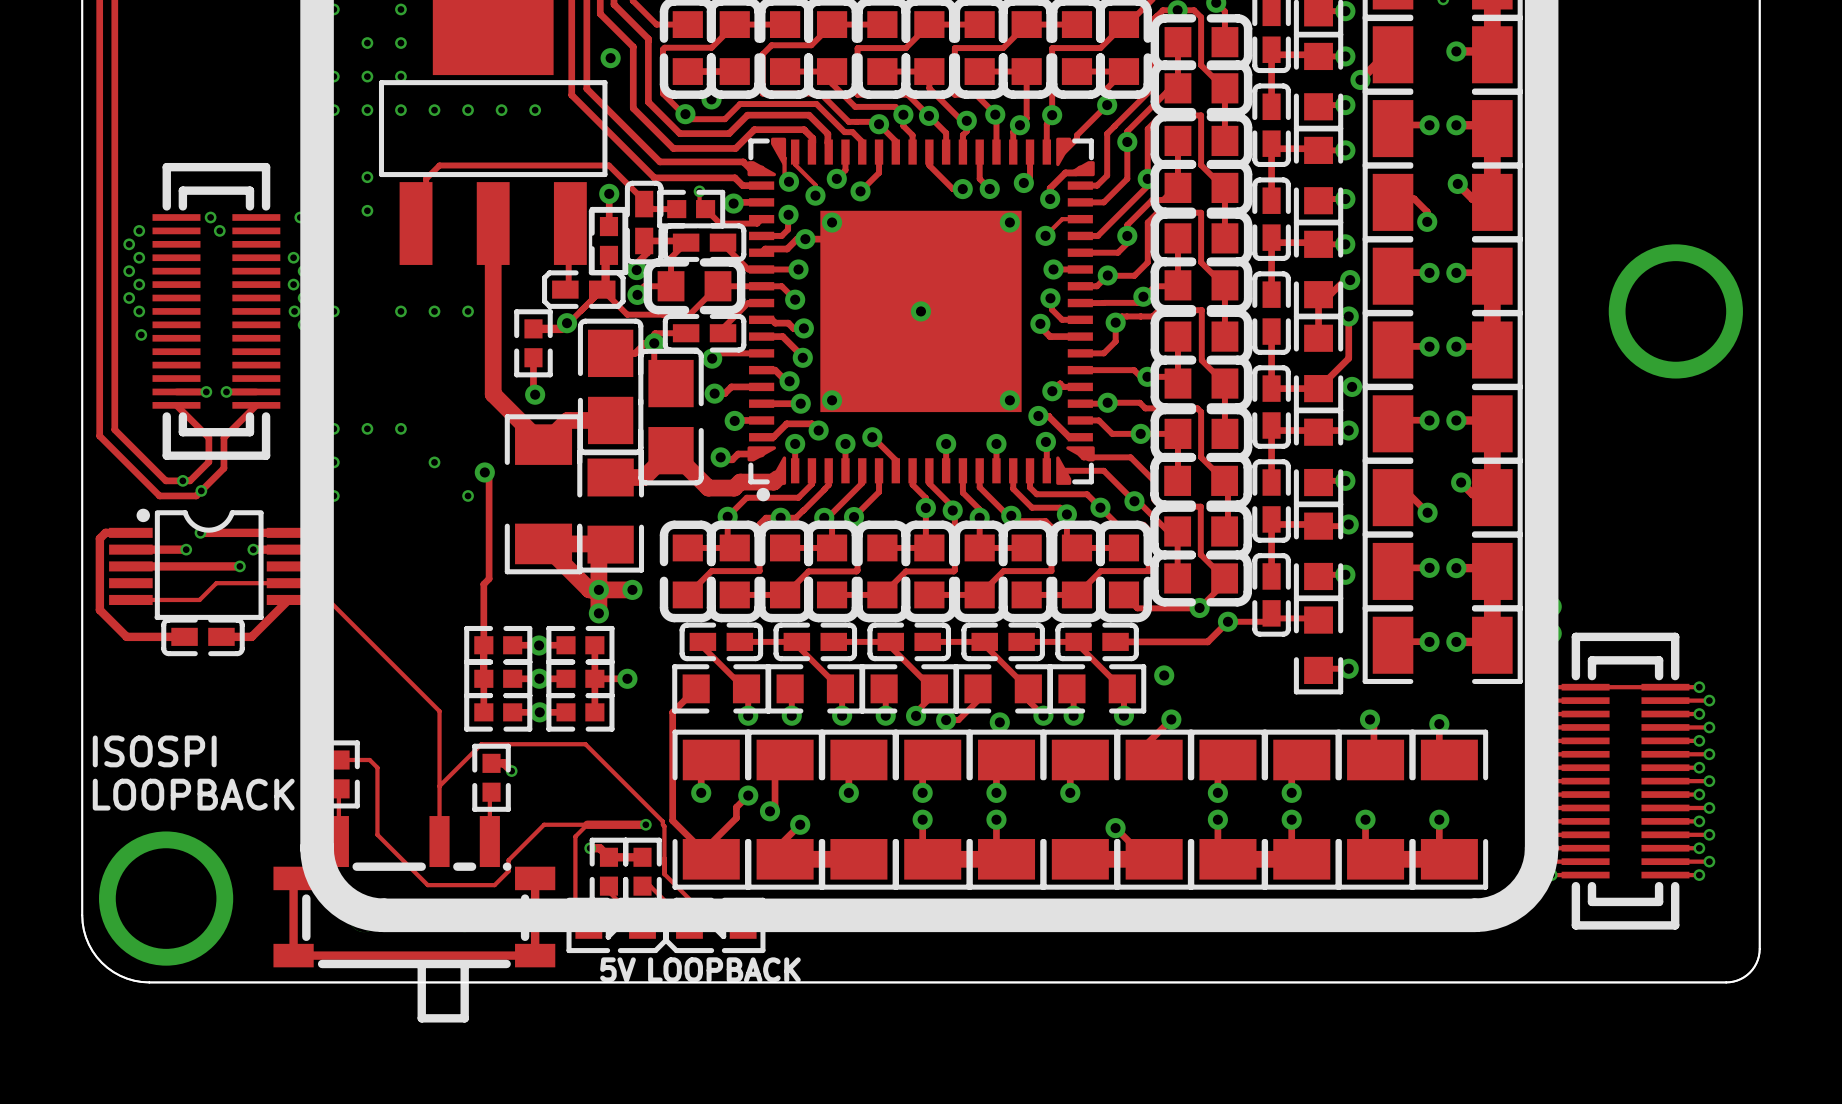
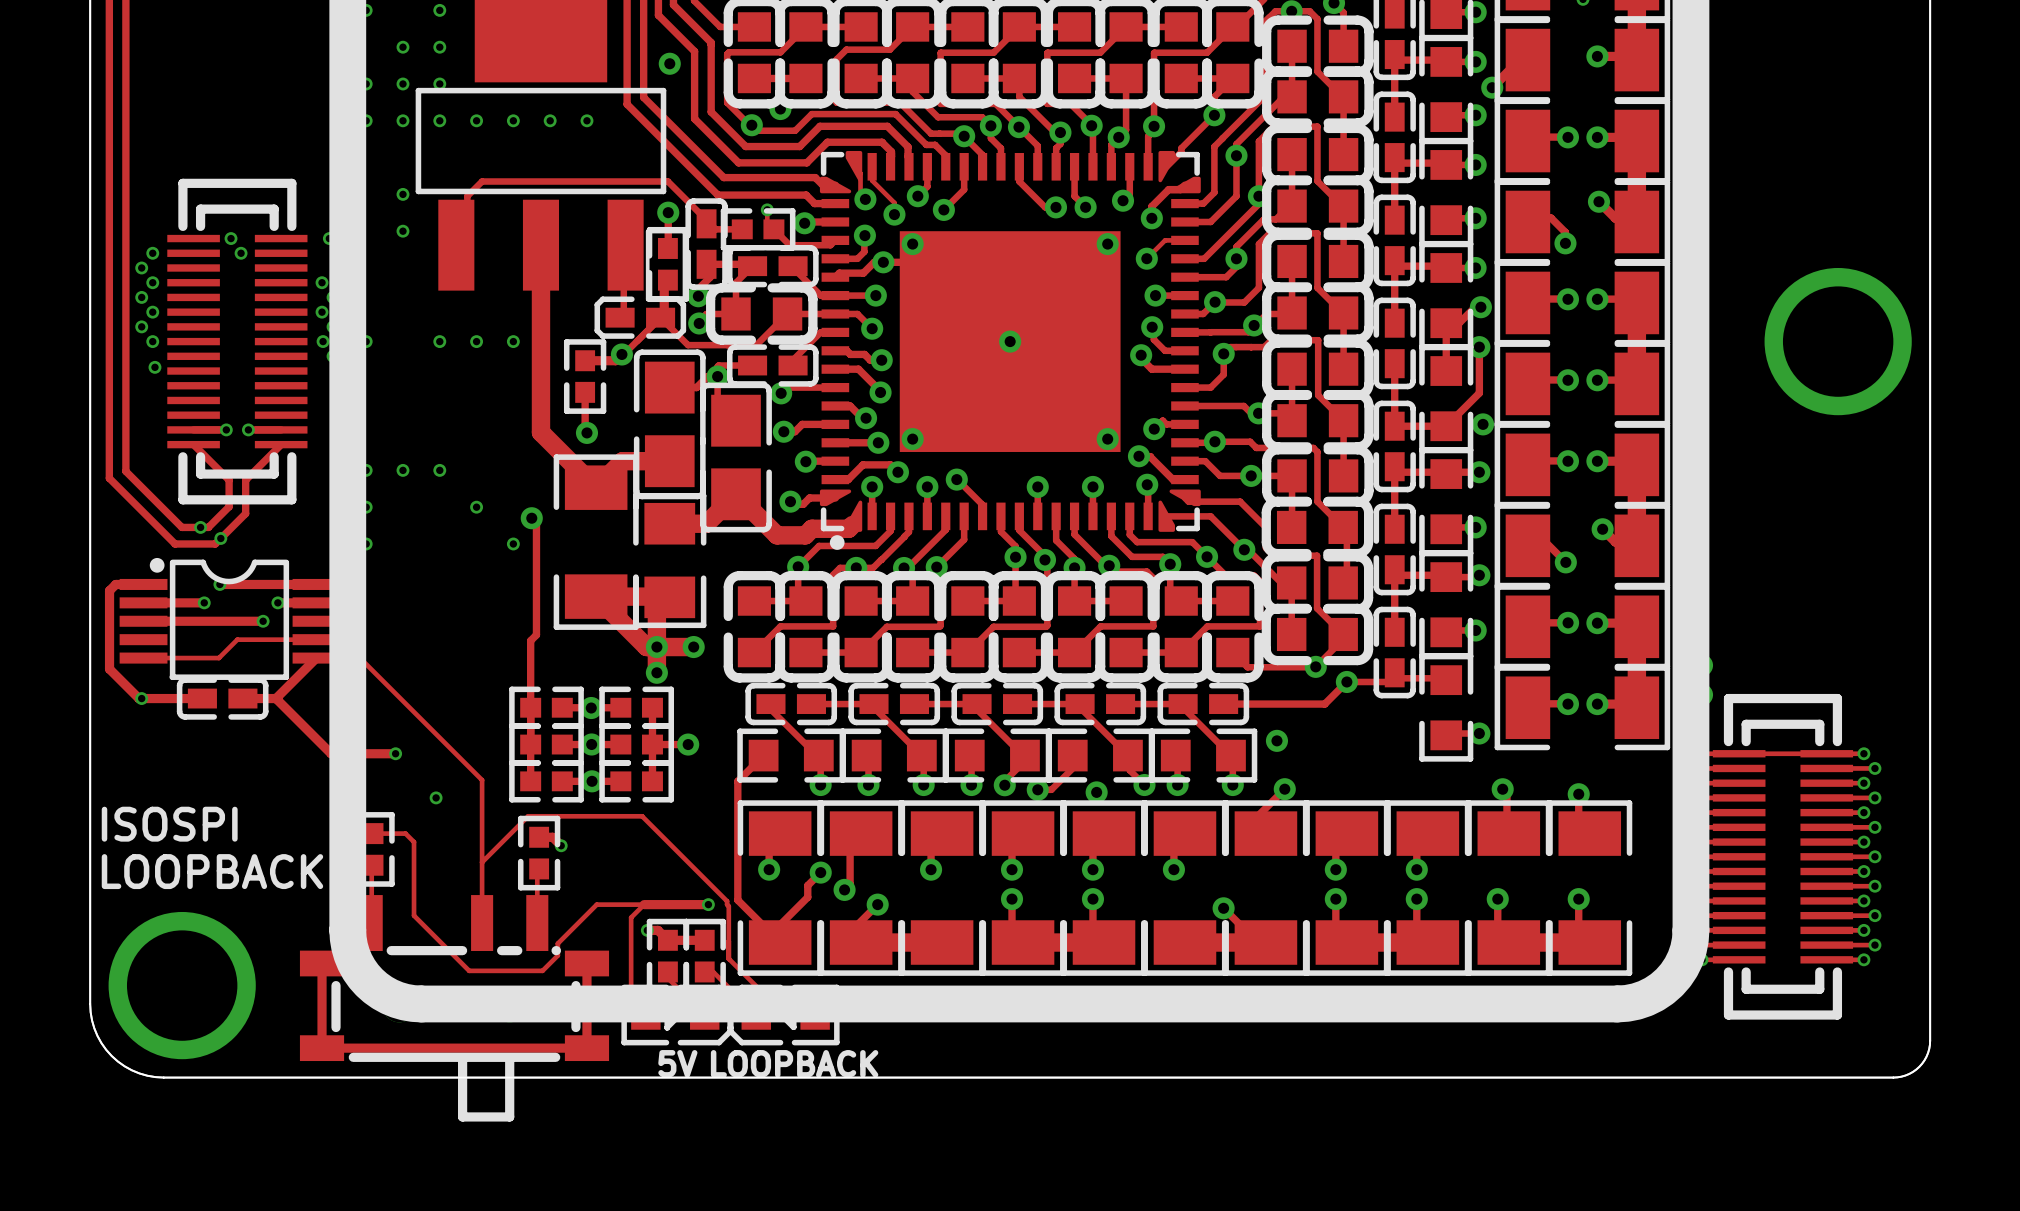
via: none -> (141, 698)
track: none -> (276, 698) (331, 753) (395, 753)
via: none -> (395, 753)
via: none -> (436, 797)

